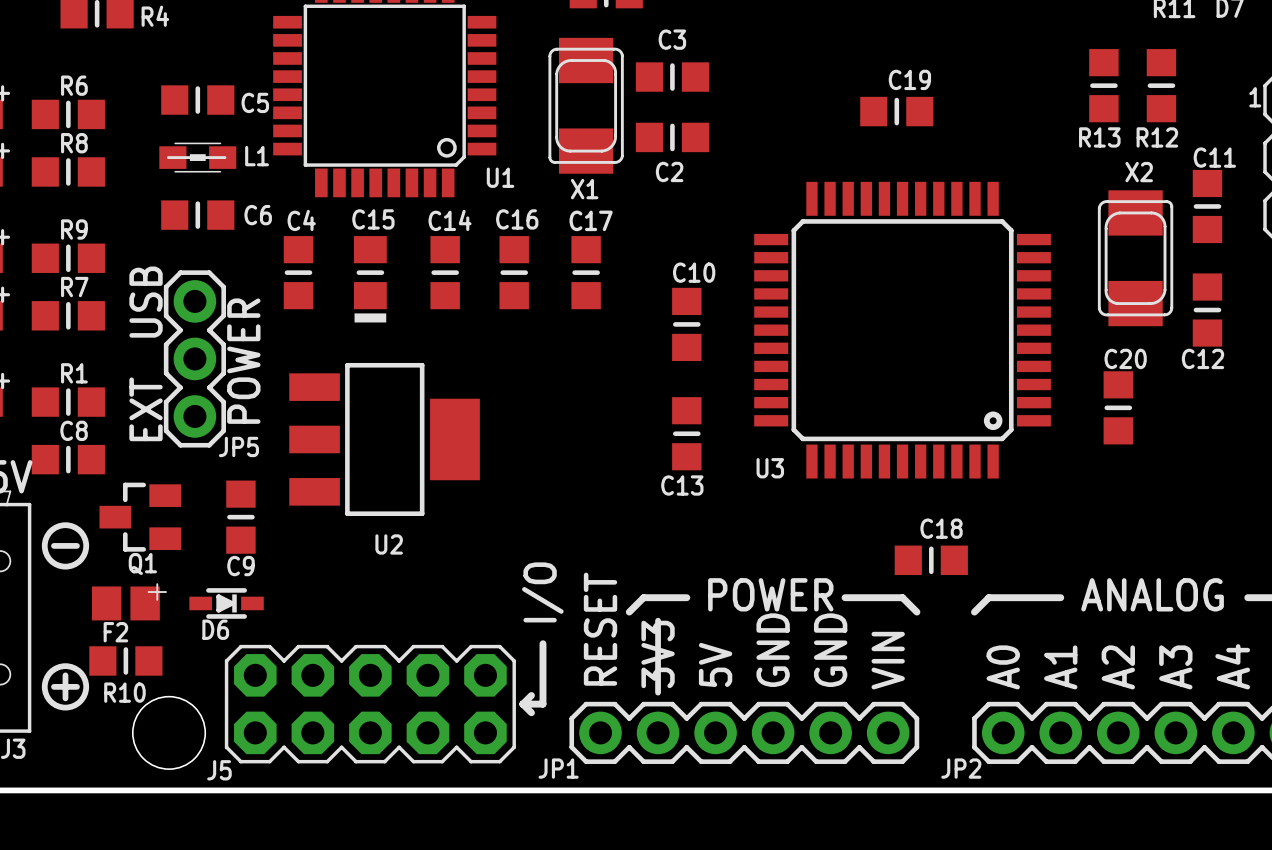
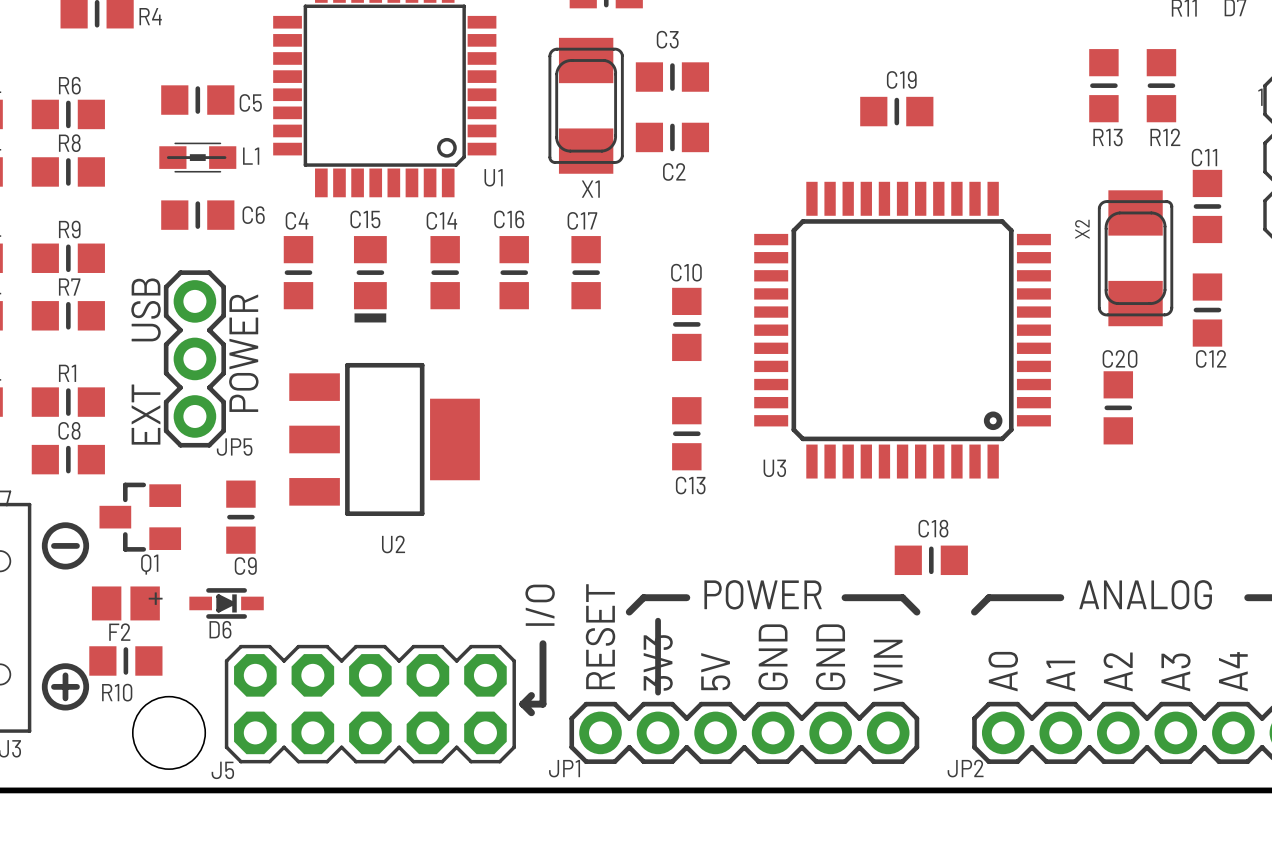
X2 name rotation: 0° (1139, 172) -> 90° counterclockwise (1082, 229)
X2 name position: X2 (1139, 172) -> X2 (1082, 229)

